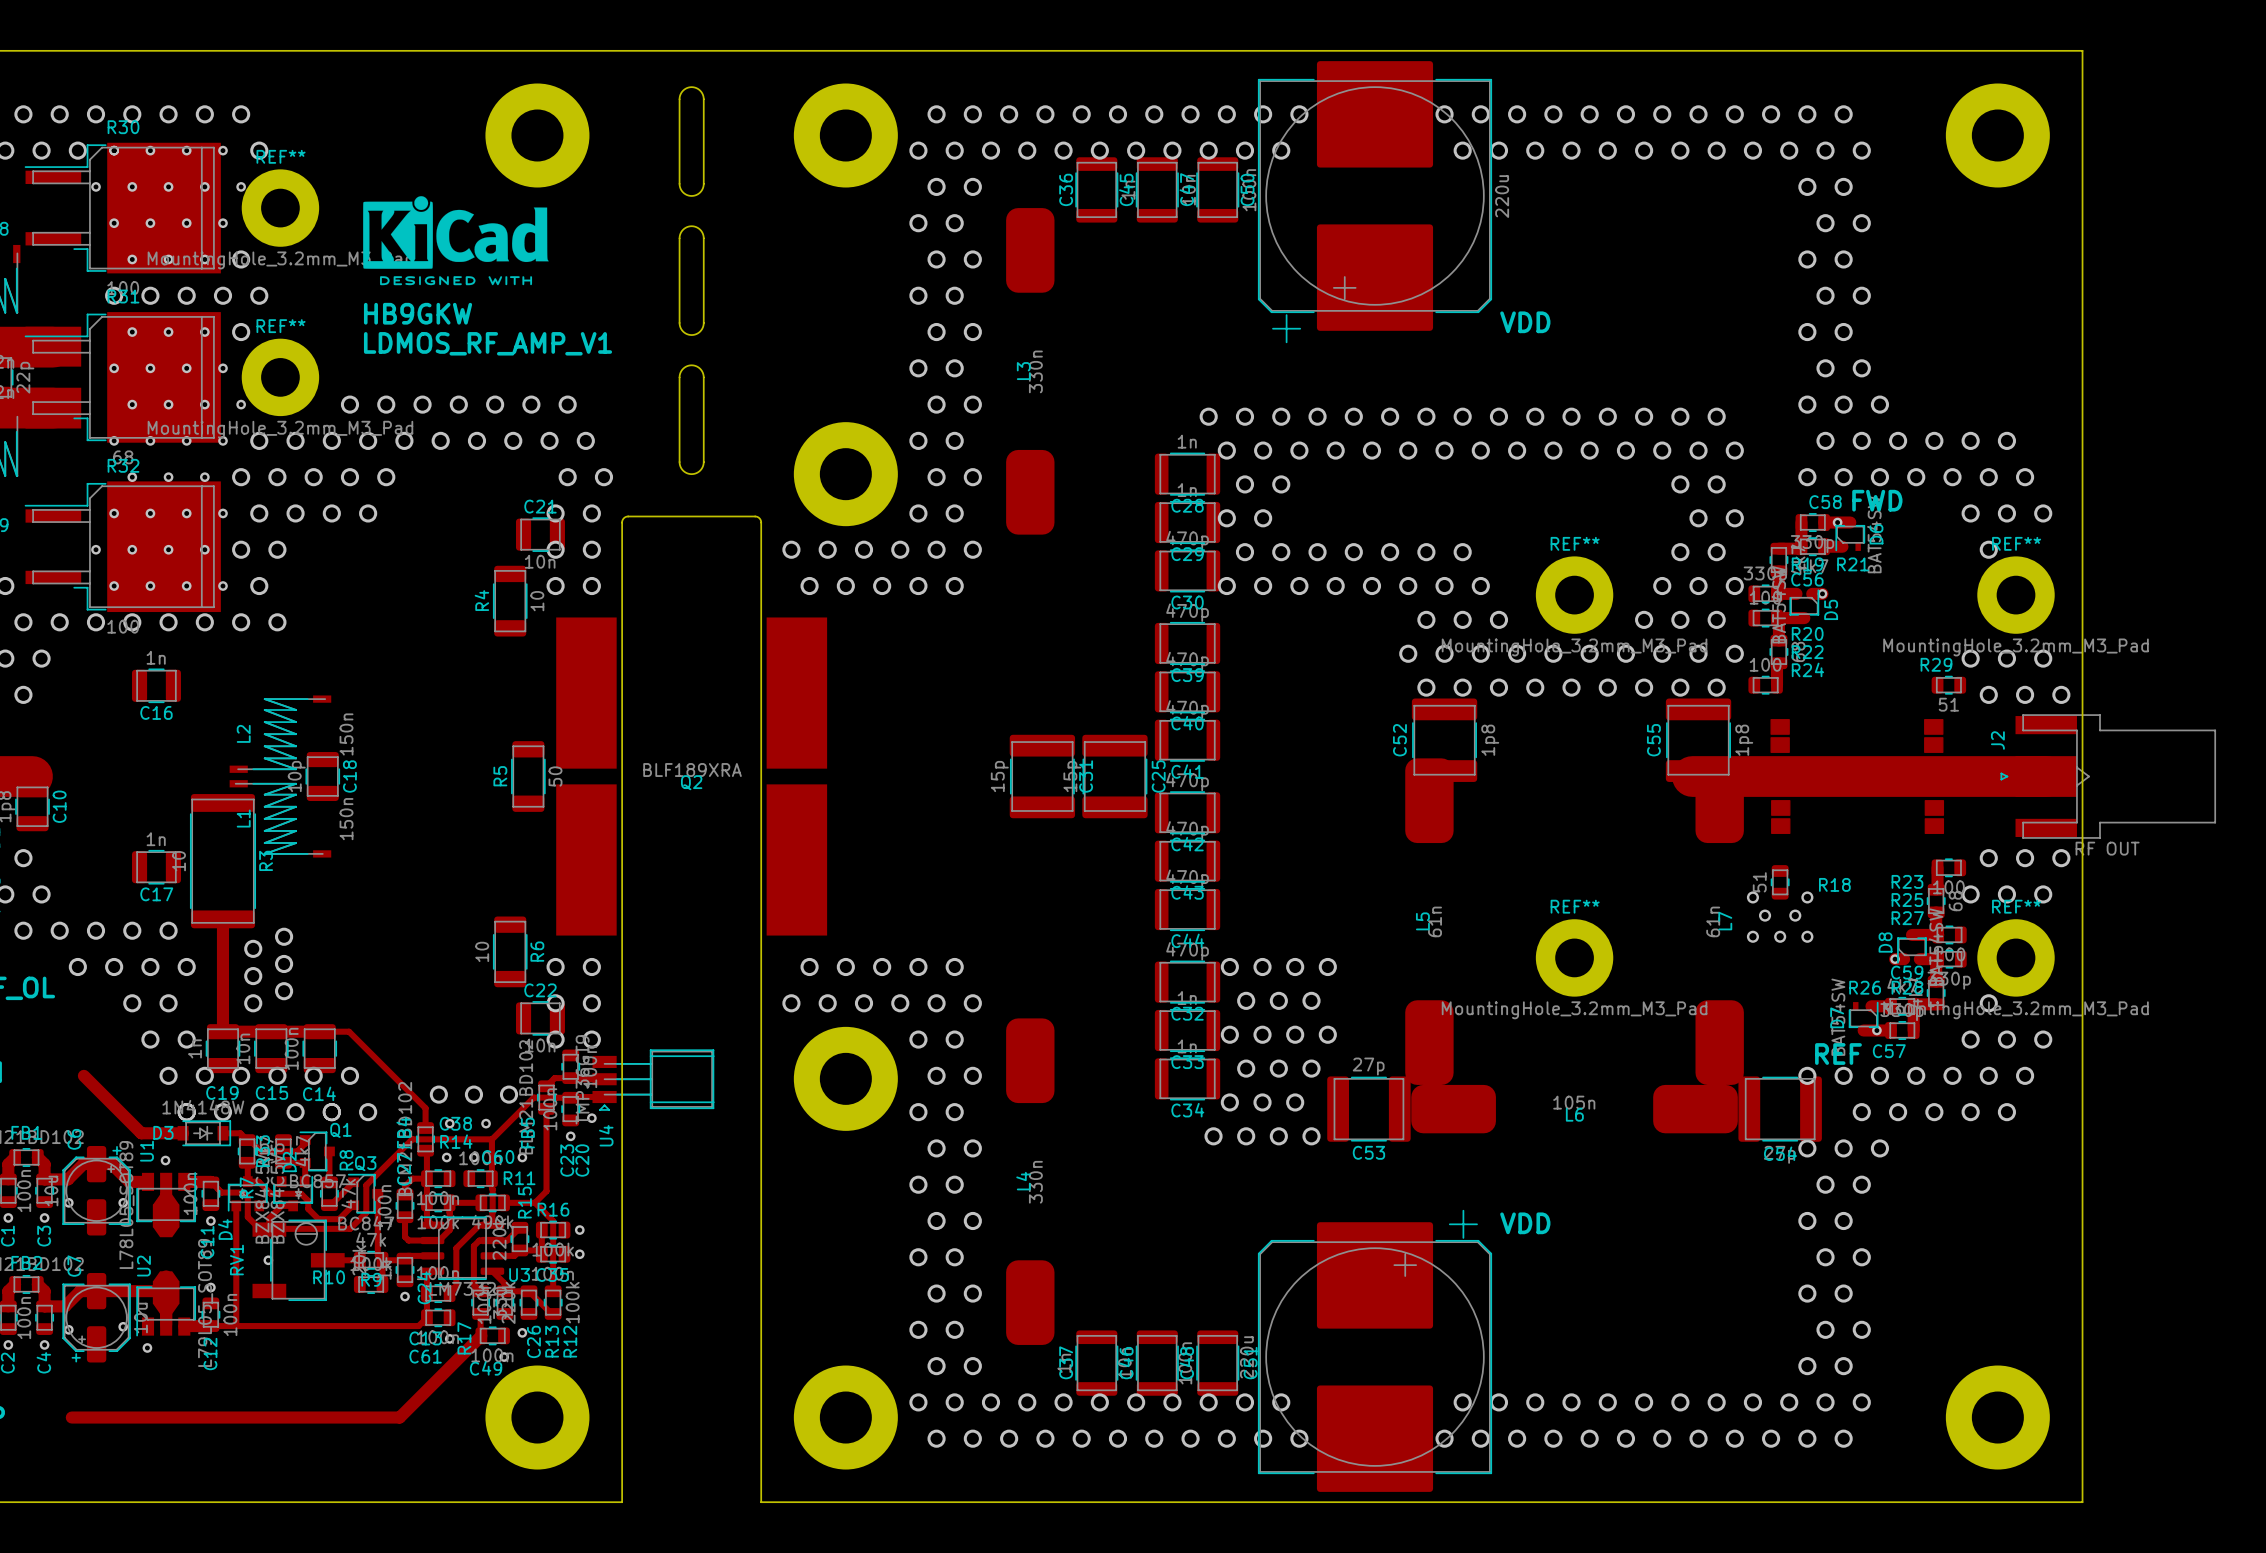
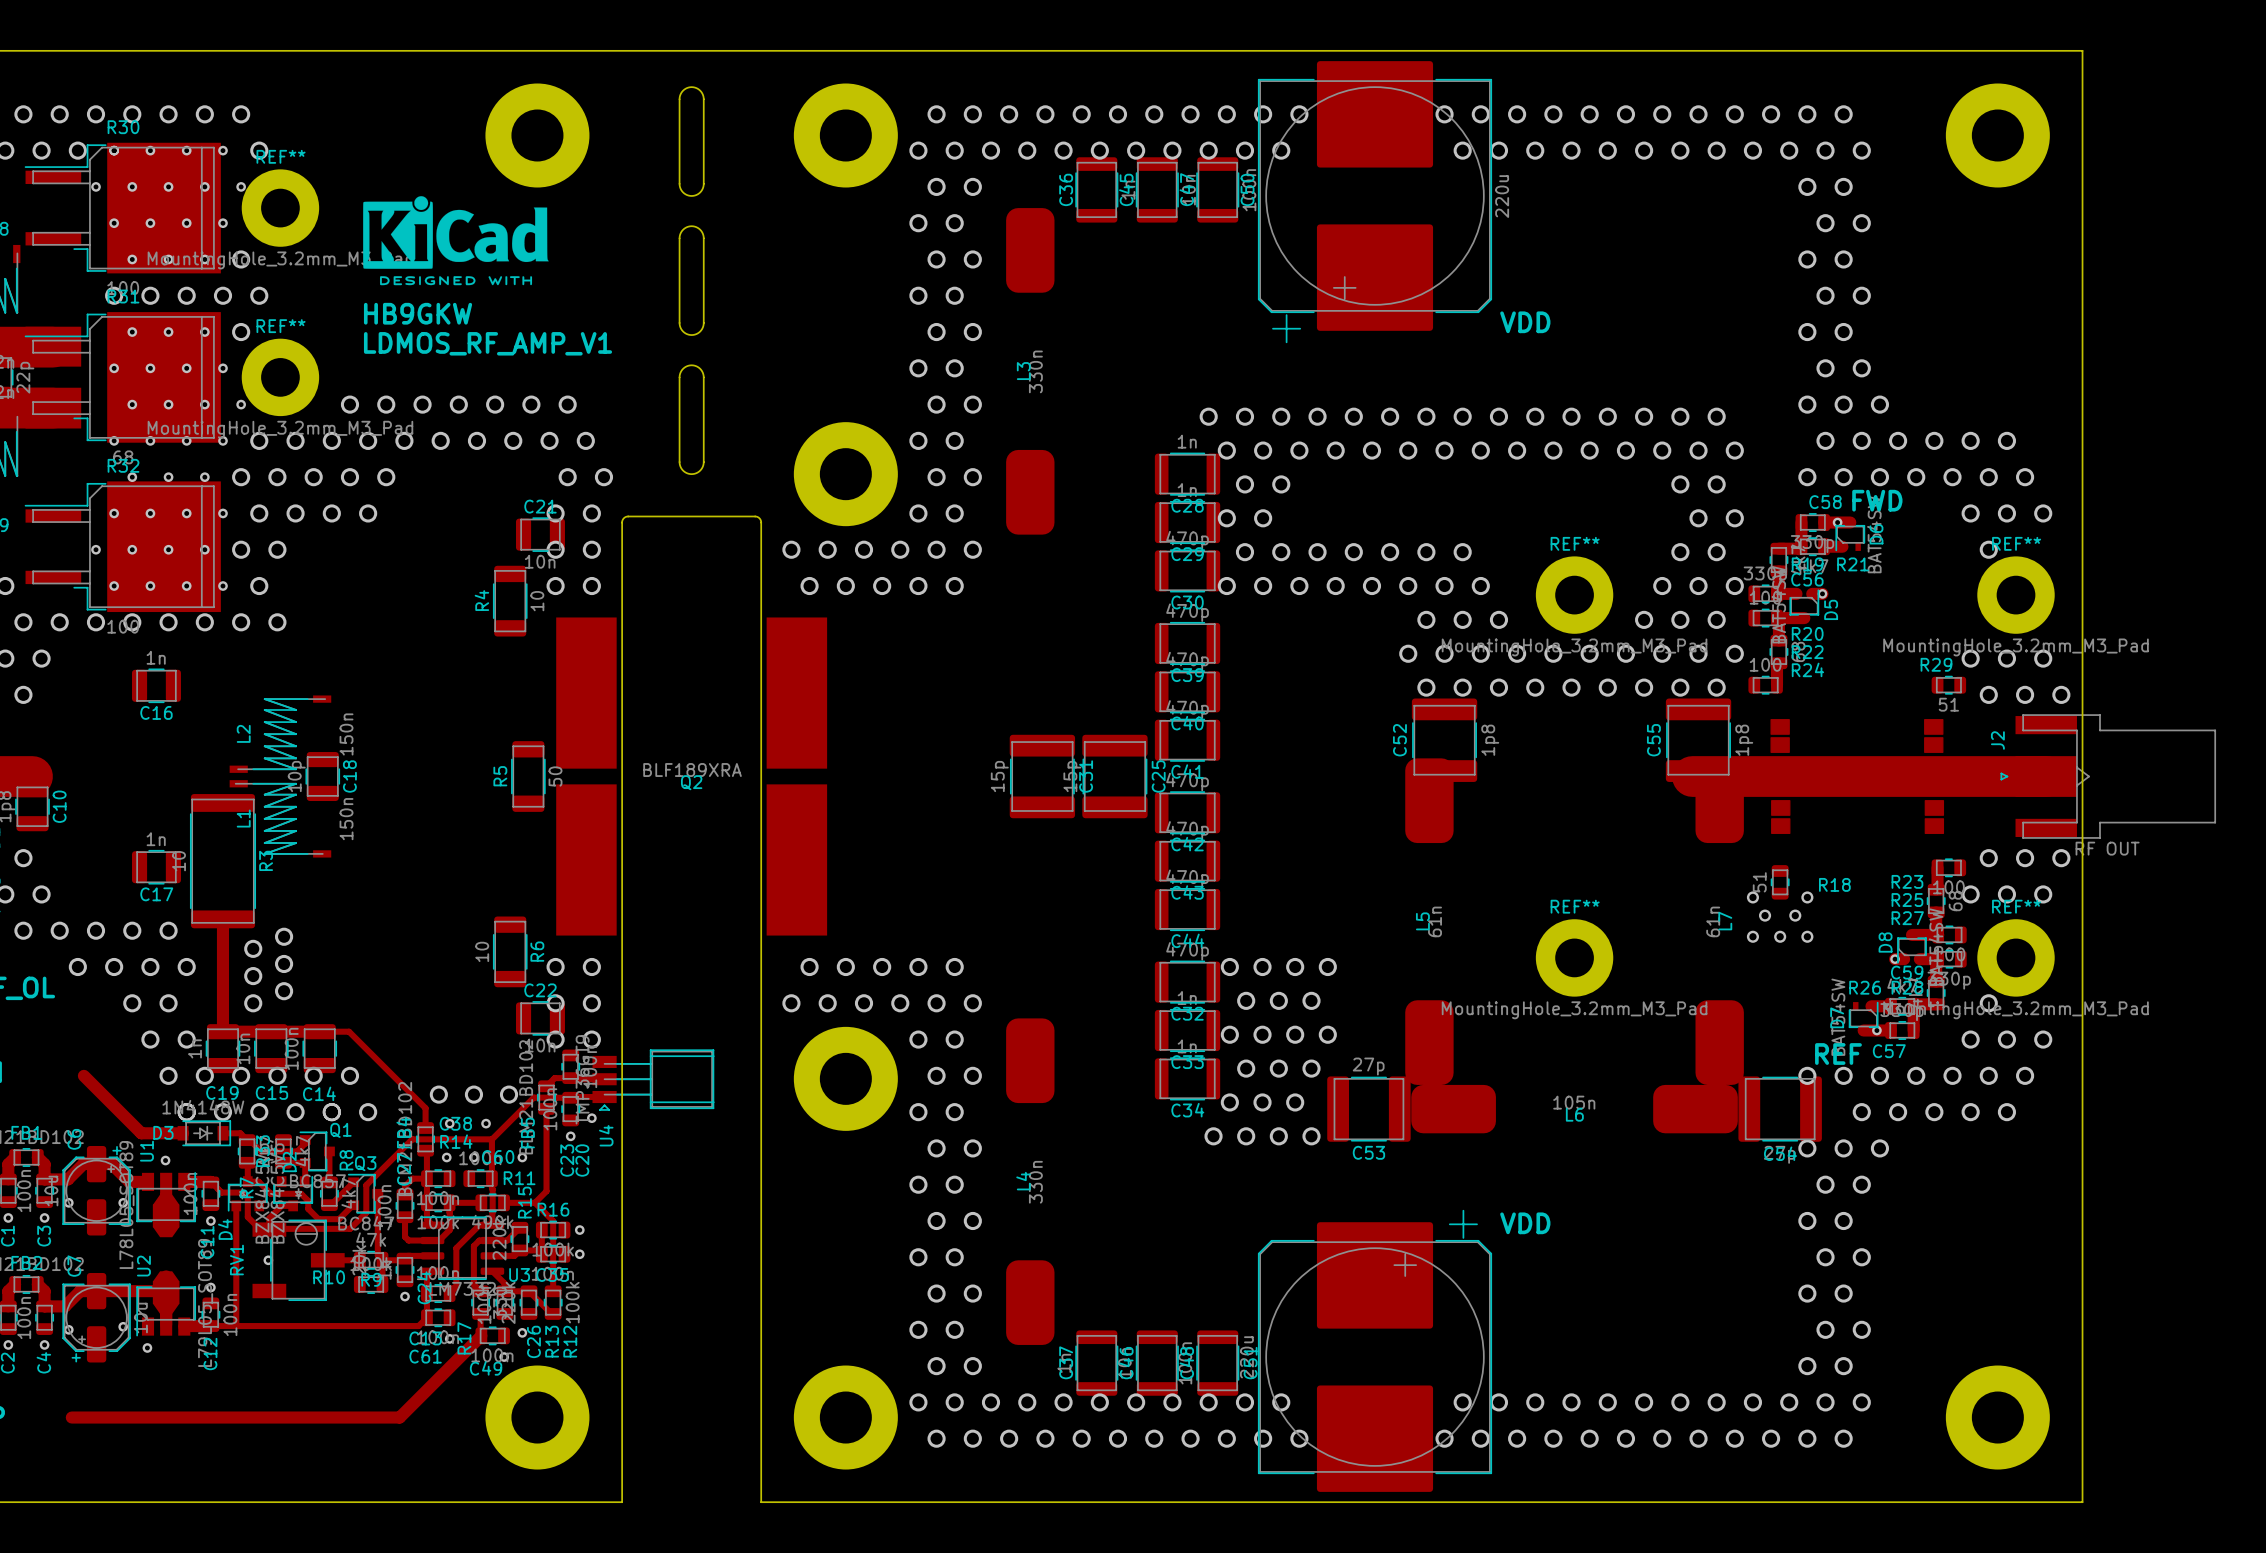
R8 value: 47k (348, 1193) -> 4k7 (348, 1193)

